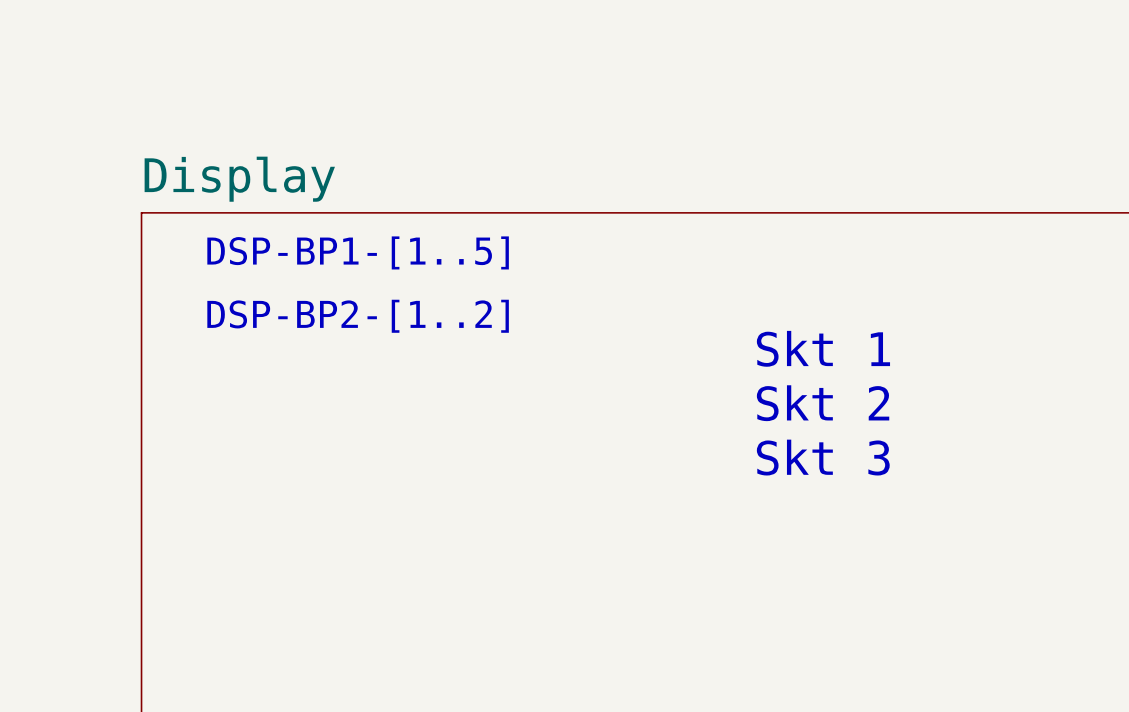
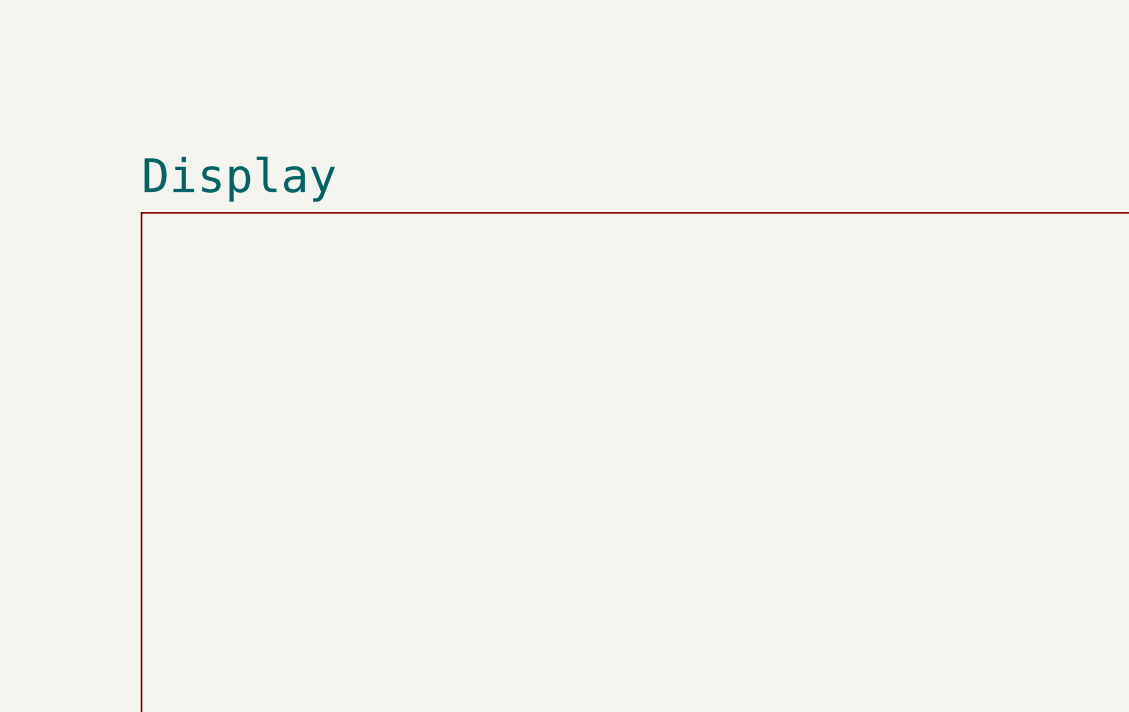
text: DSP-BP1-[1..5] (358, 252) -> none
text: DSP-BP2-[1..2] (358, 316) -> none
text: Skt 1 (823, 348) -> none
text: Skt 2 (823, 403) -> none
text: Skt 3 (823, 457) -> none

